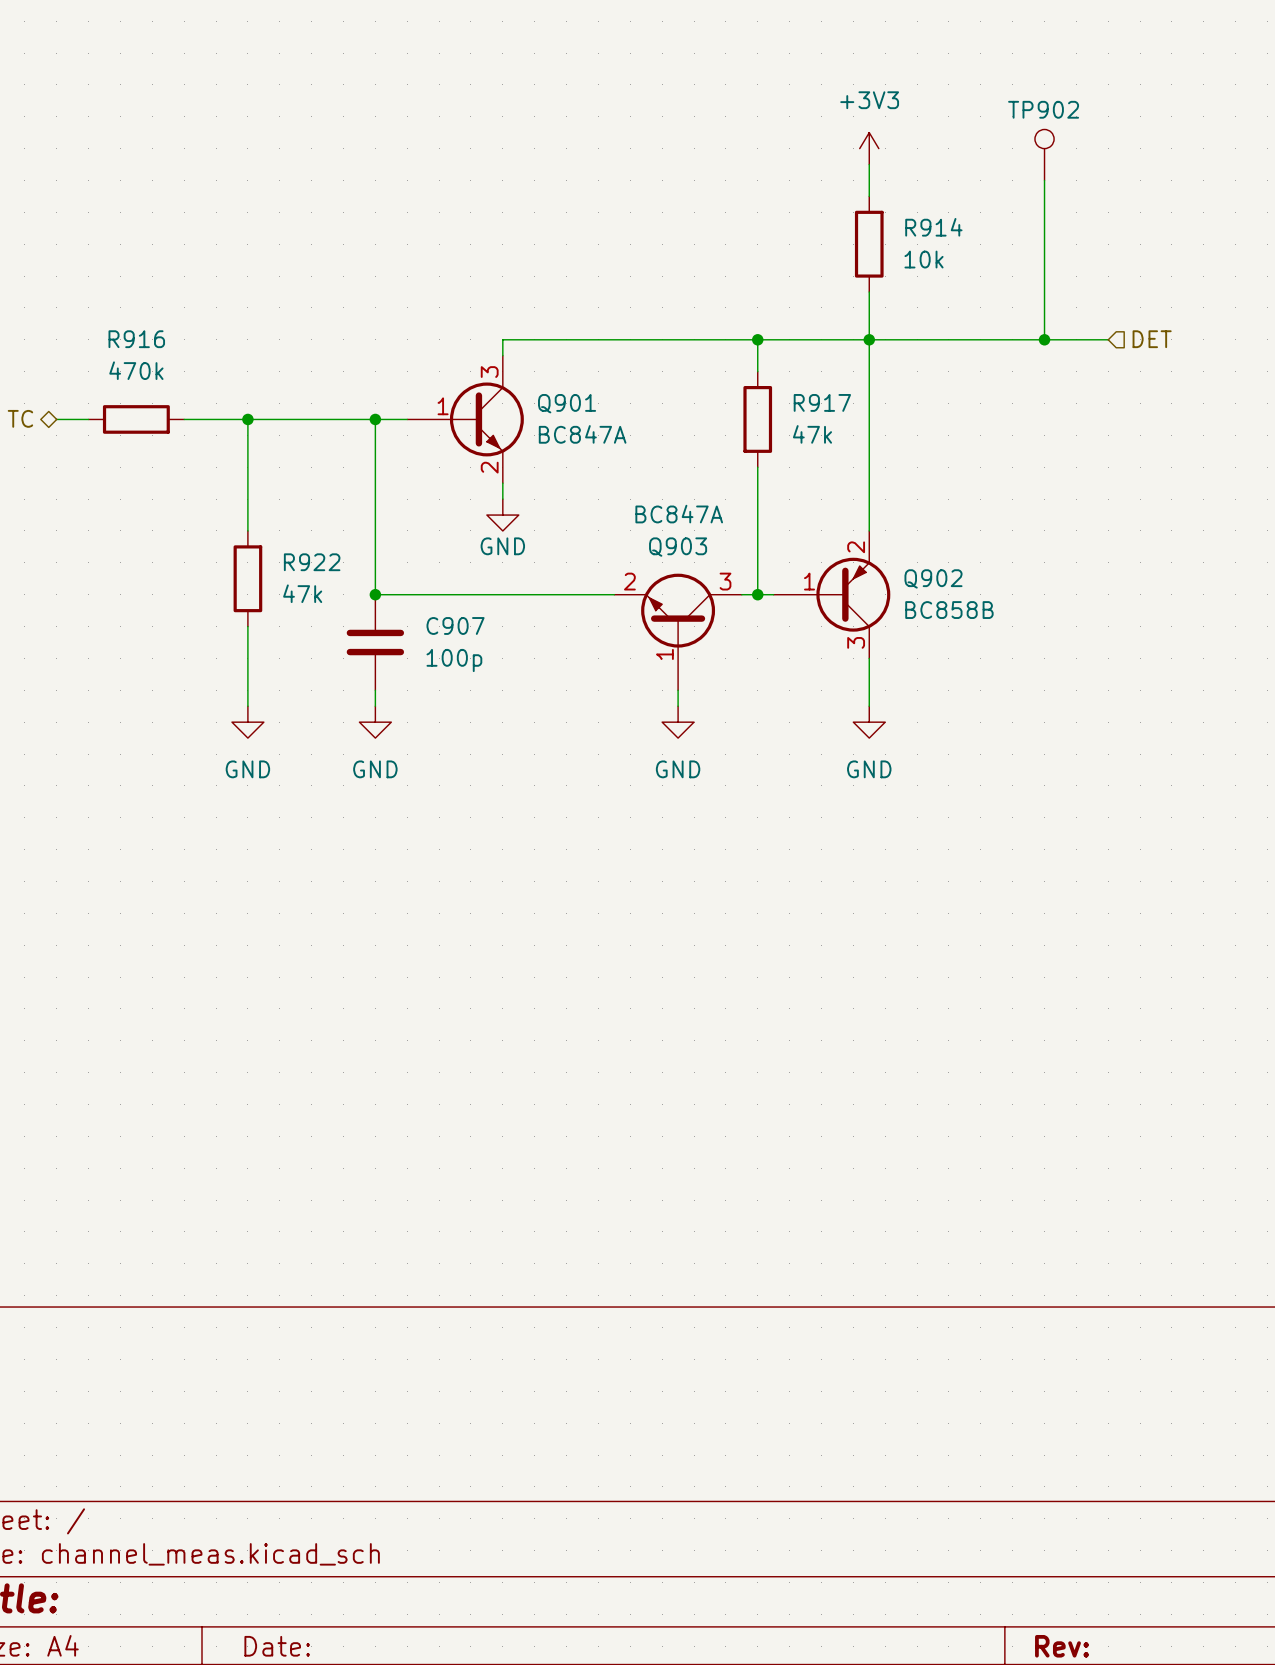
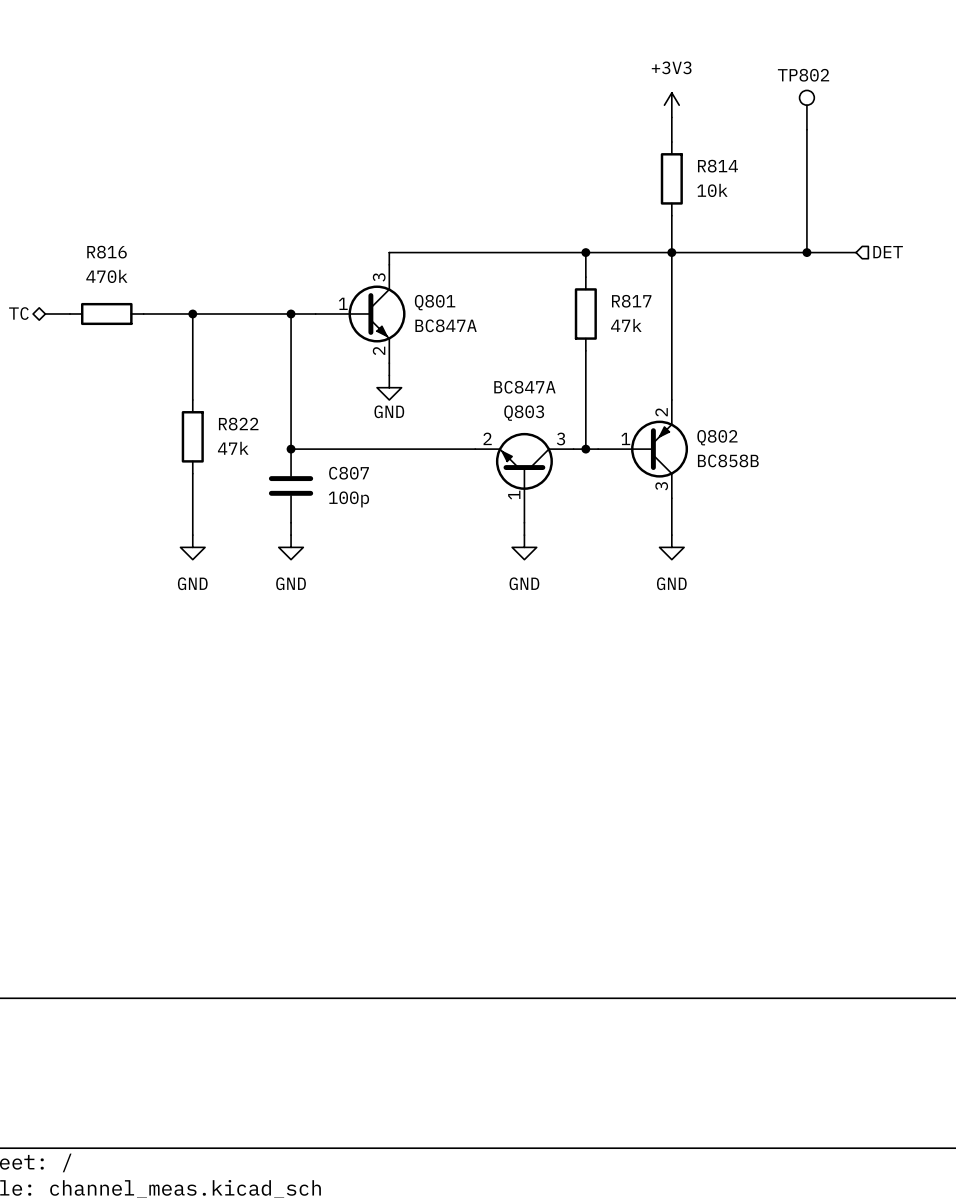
TP902 name: TP902 (1043, 109) -> TP802 (803, 75)
R914 name: R914 (933, 227) -> R814 (717, 166)
R916 name: R916 (136, 339) -> R816 (107, 252)
R917 name: R917 (822, 402) -> R817 (631, 301)
Q901 name: Q901 (567, 403) -> Q801 (435, 302)
Q903 name: Q903 (678, 547) -> Q803 (524, 413)
R922 name: R922 (312, 562) -> R822 (238, 424)
Q902 name: Q902 (933, 578) -> Q802 (717, 437)
C907 name: C907 (455, 625) -> C807 (349, 473)

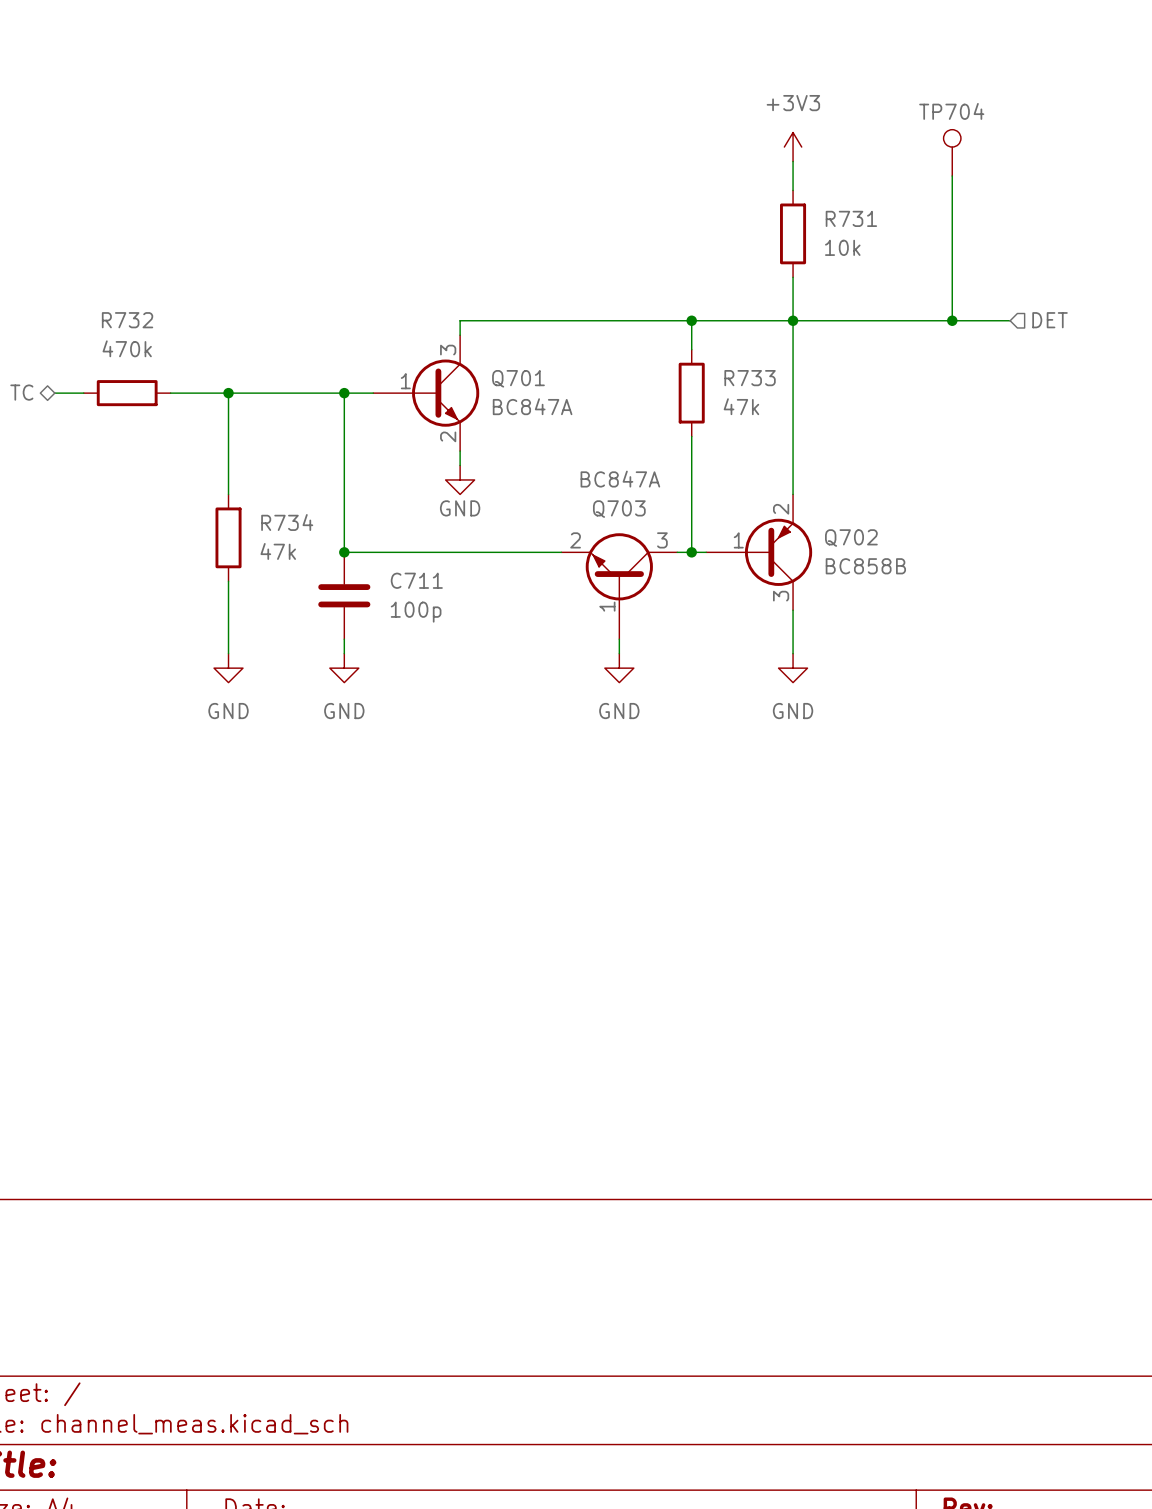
TP802 name: TP802 (803, 75) -> TP704 (951, 111)
R814 name: R814 (717, 166) -> R731 (851, 218)
R816 name: R816 (107, 252) -> R732 (127, 320)
R817 name: R817 (631, 301) -> R733 (750, 378)
Q801 name: Q801 (435, 302) -> Q701 (518, 378)
Q803 name: Q803 (524, 413) -> Q703 (619, 509)
R822 name: R822 (238, 424) -> R734 (287, 522)
Q802 name: Q802 (717, 437) -> Q702 (851, 538)
C807 name: C807 (349, 473) -> C711 (416, 580)

